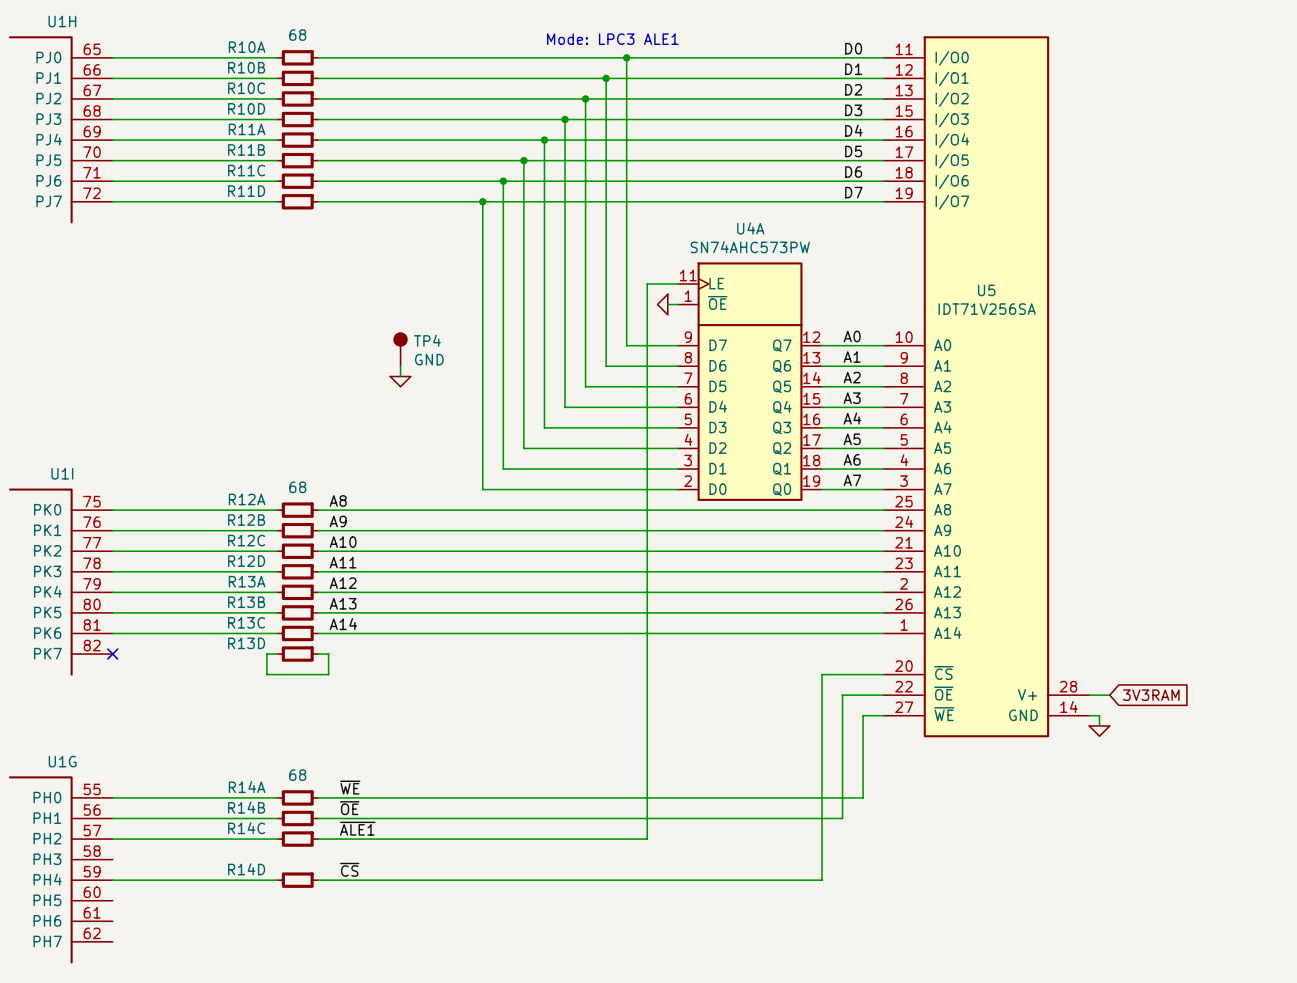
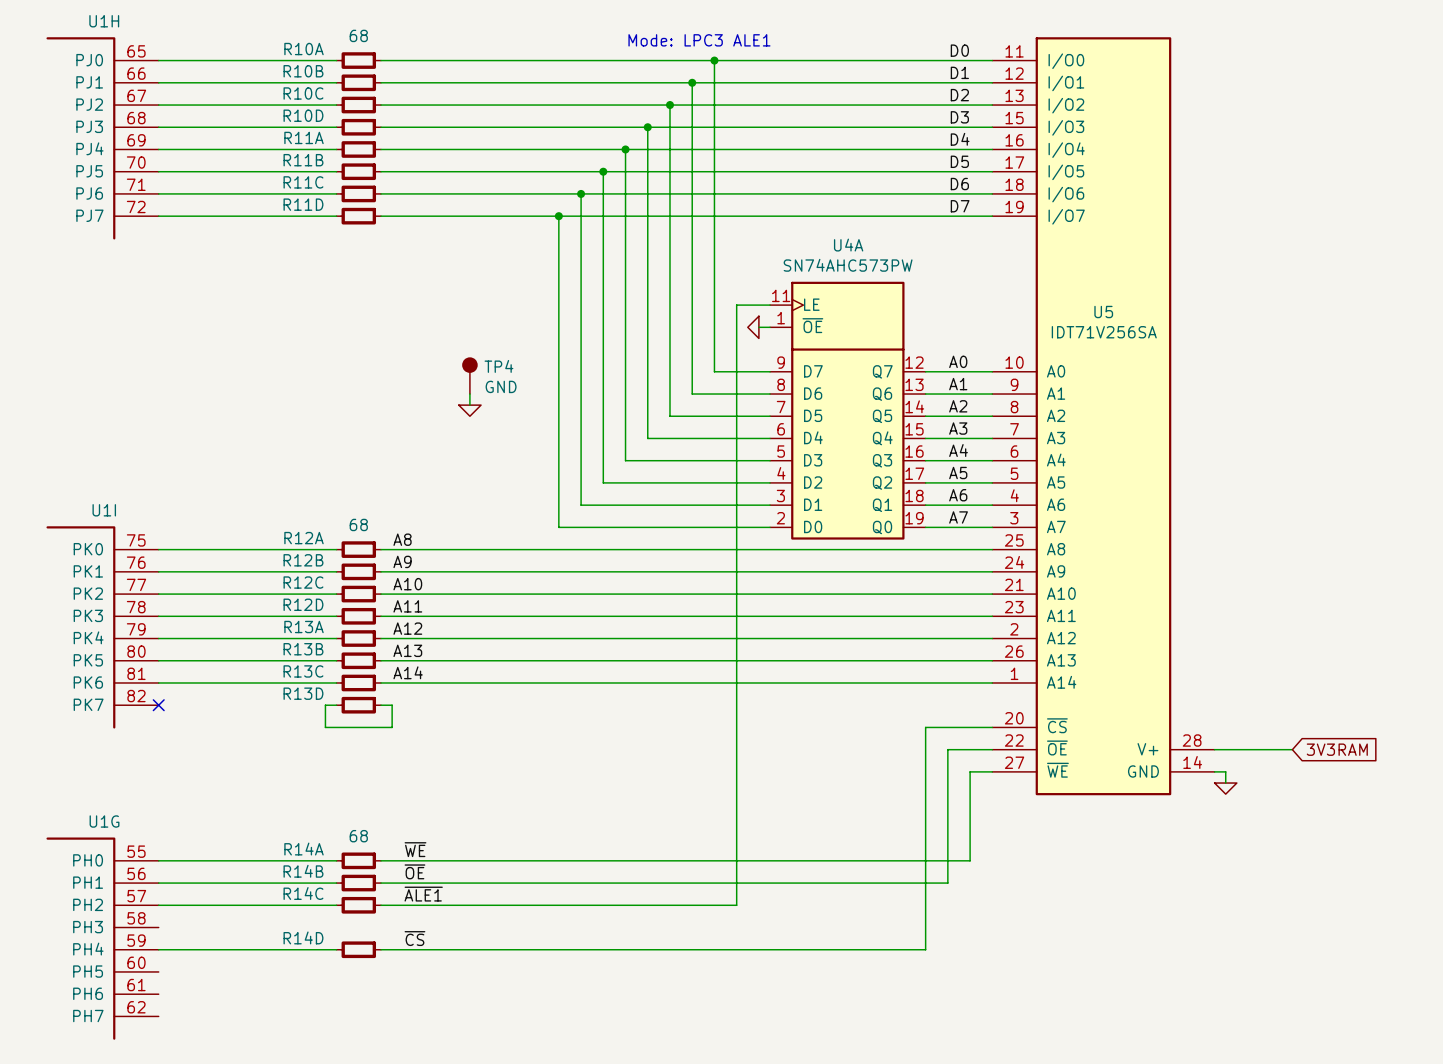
wire: none -> (1236, 749) (1292, 749)
global label position: 3V3RAM (1151, 695) -> 3V3RAM (1337, 749)

